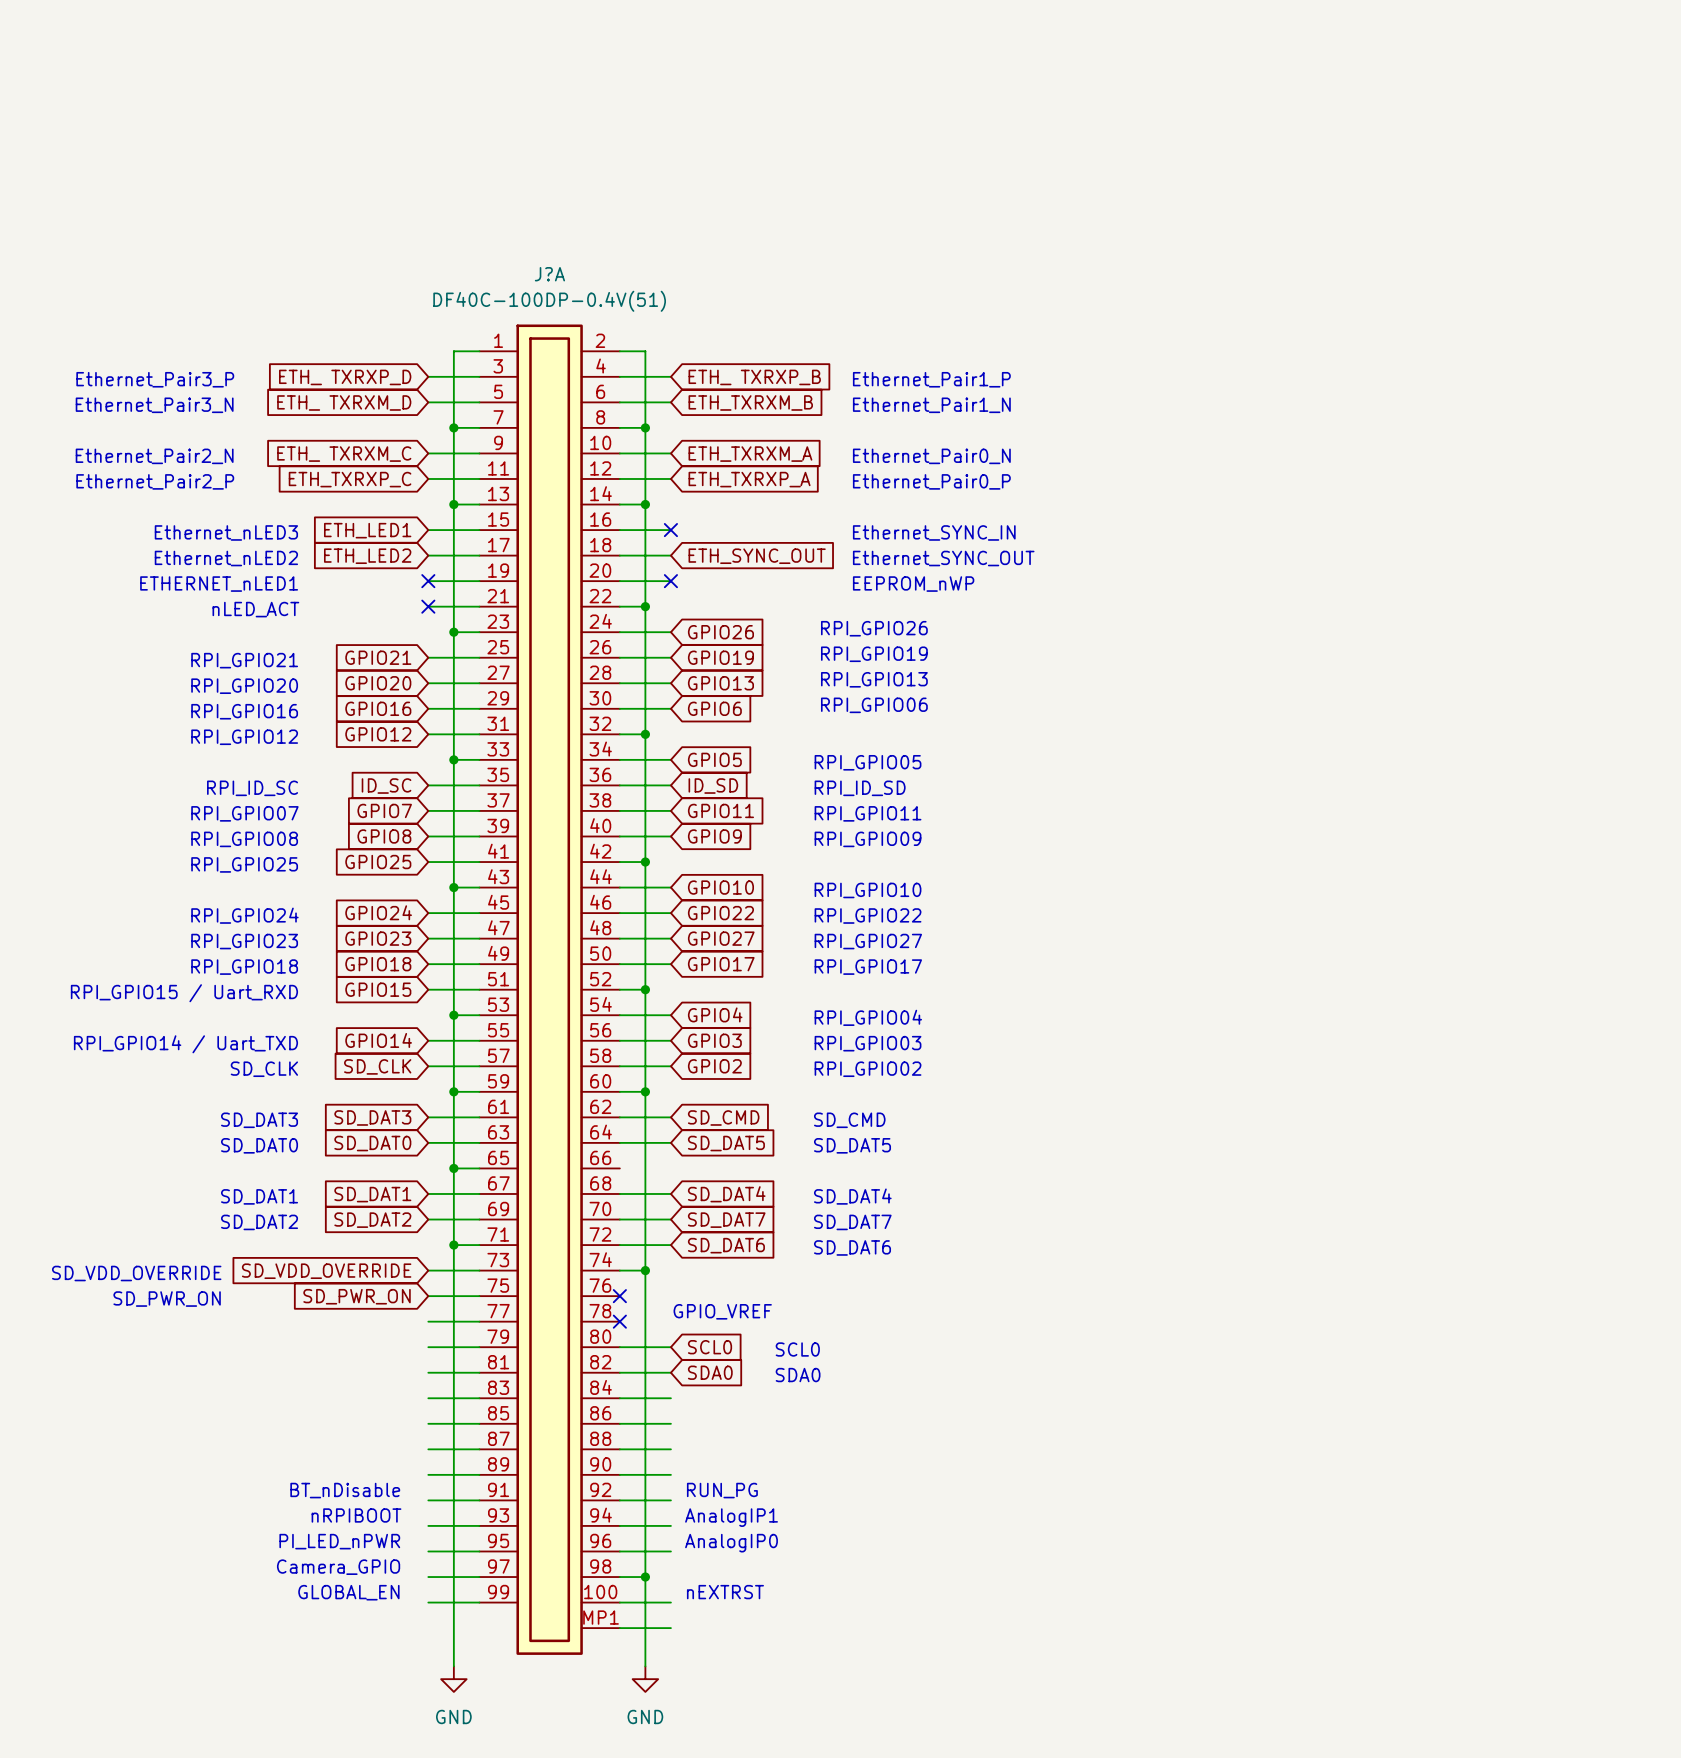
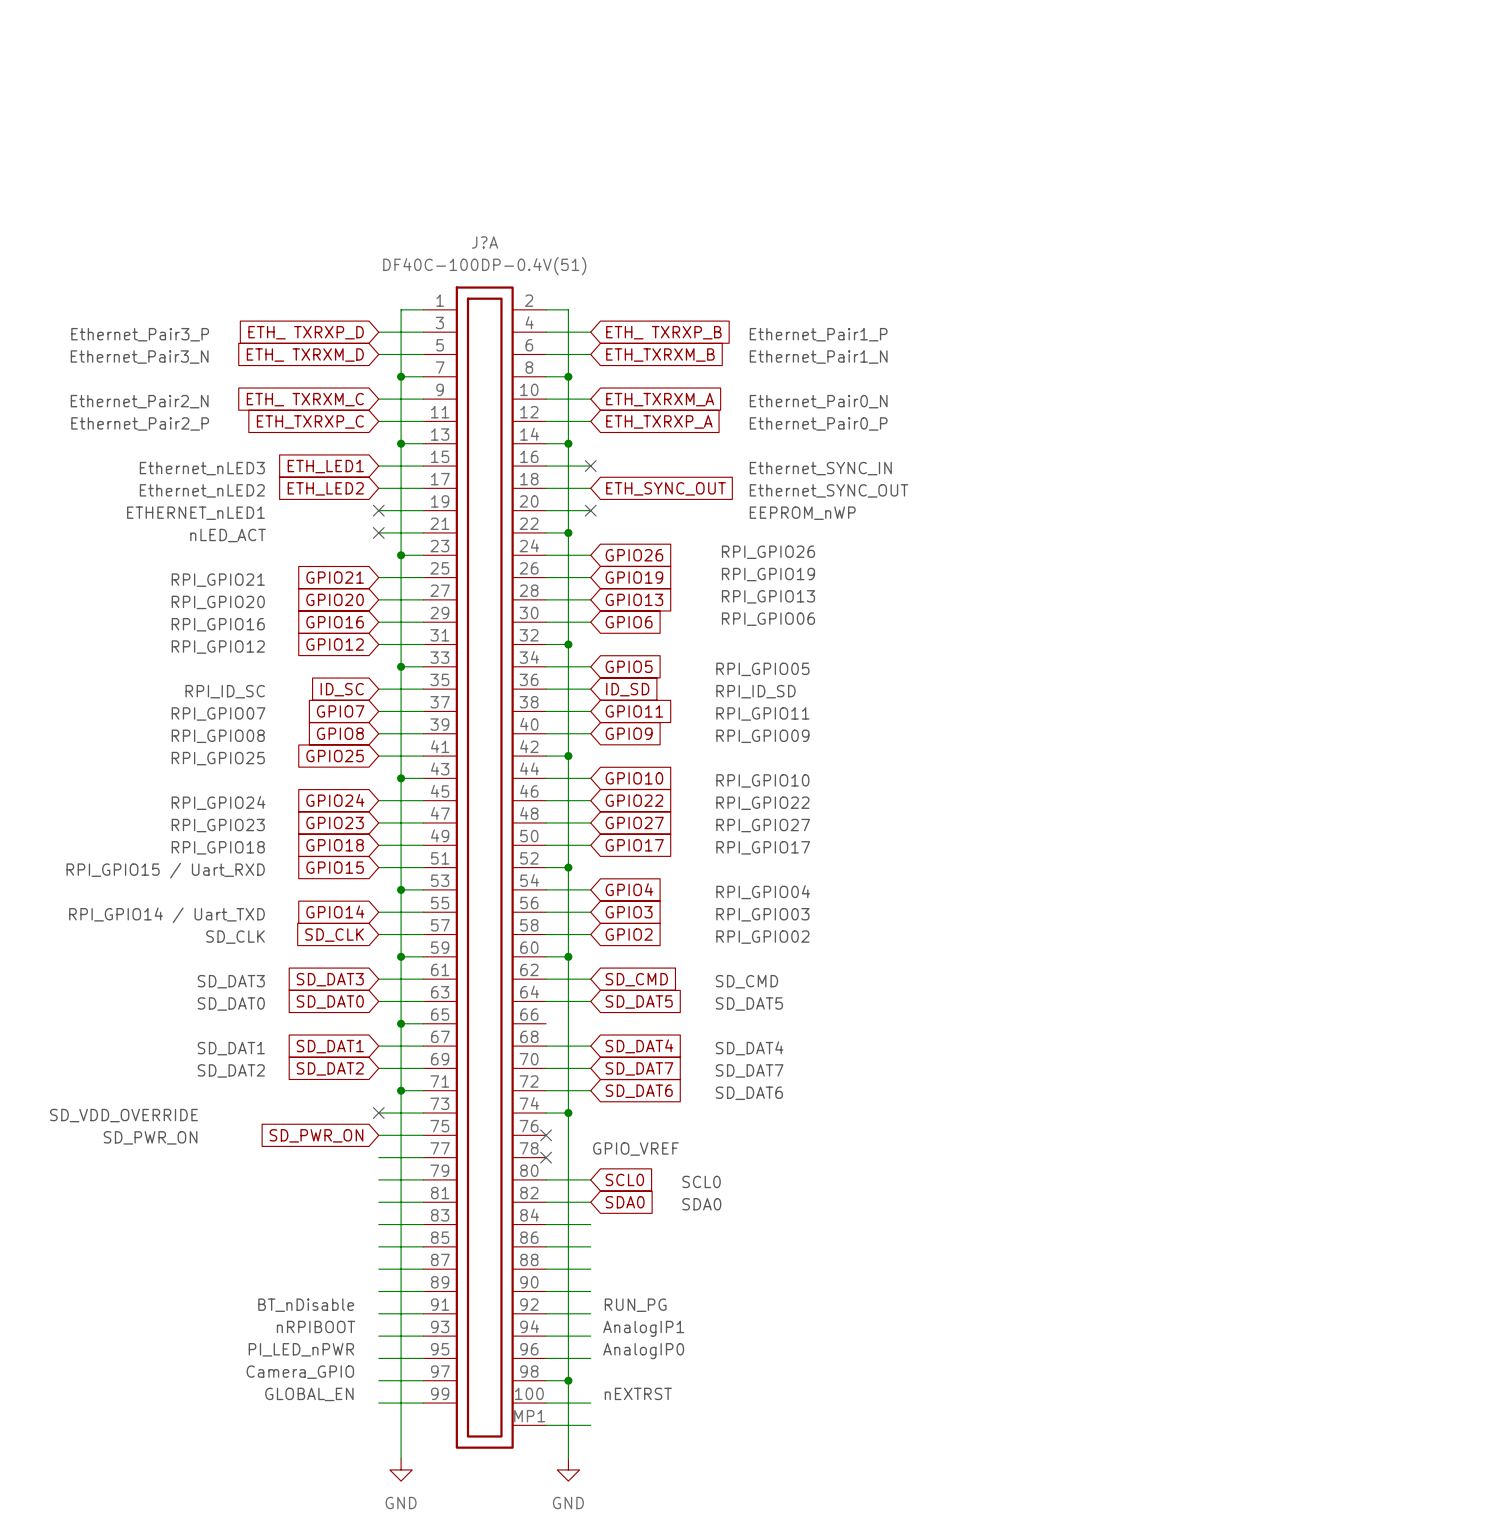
no-connect mark: none -> (378, 1113)
global label: SD_VDD_OVERRIDE (326, 1271) -> none

